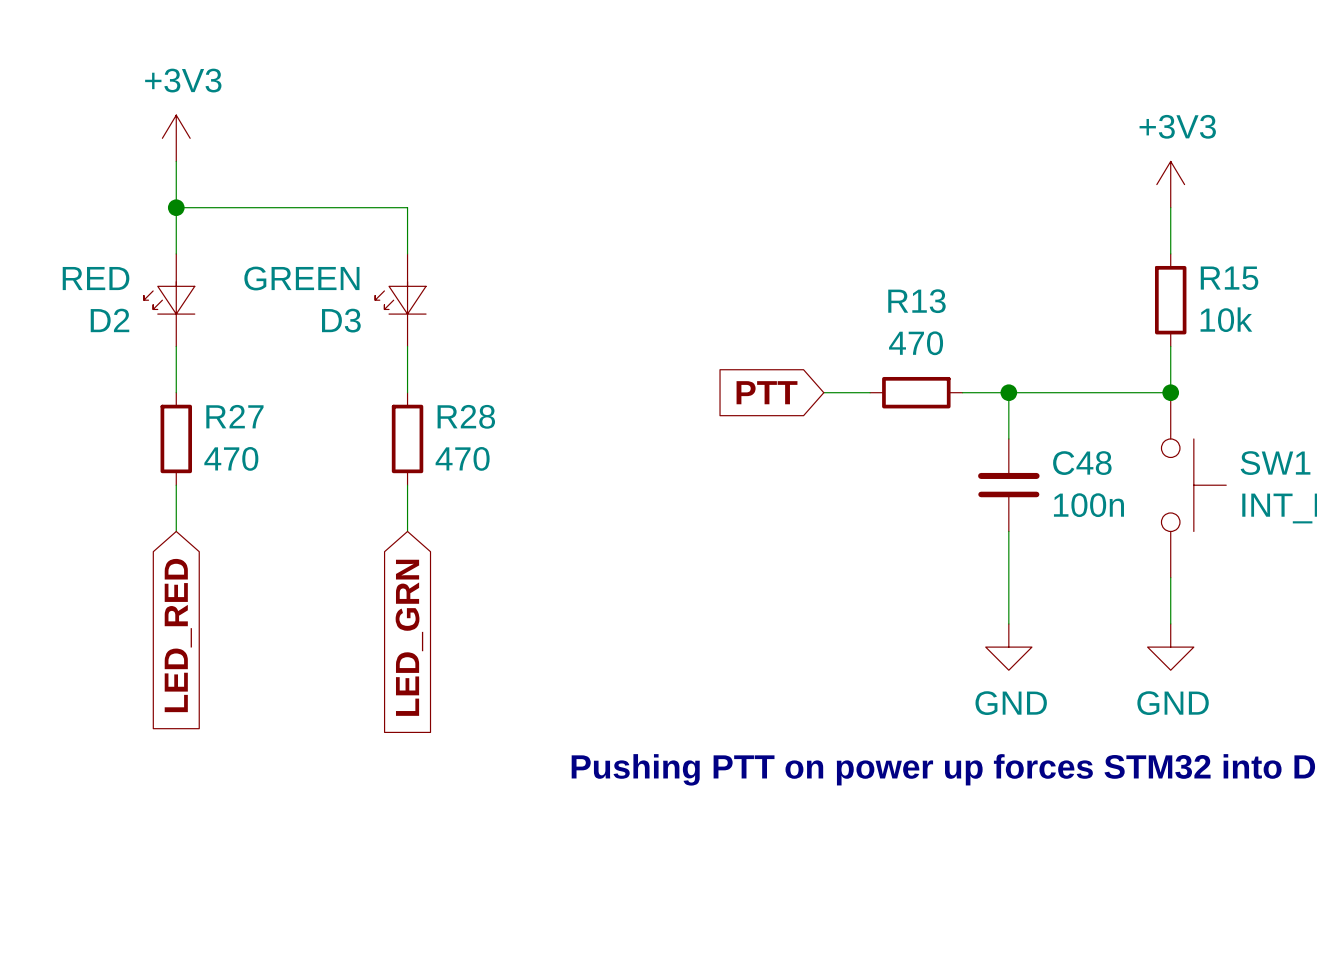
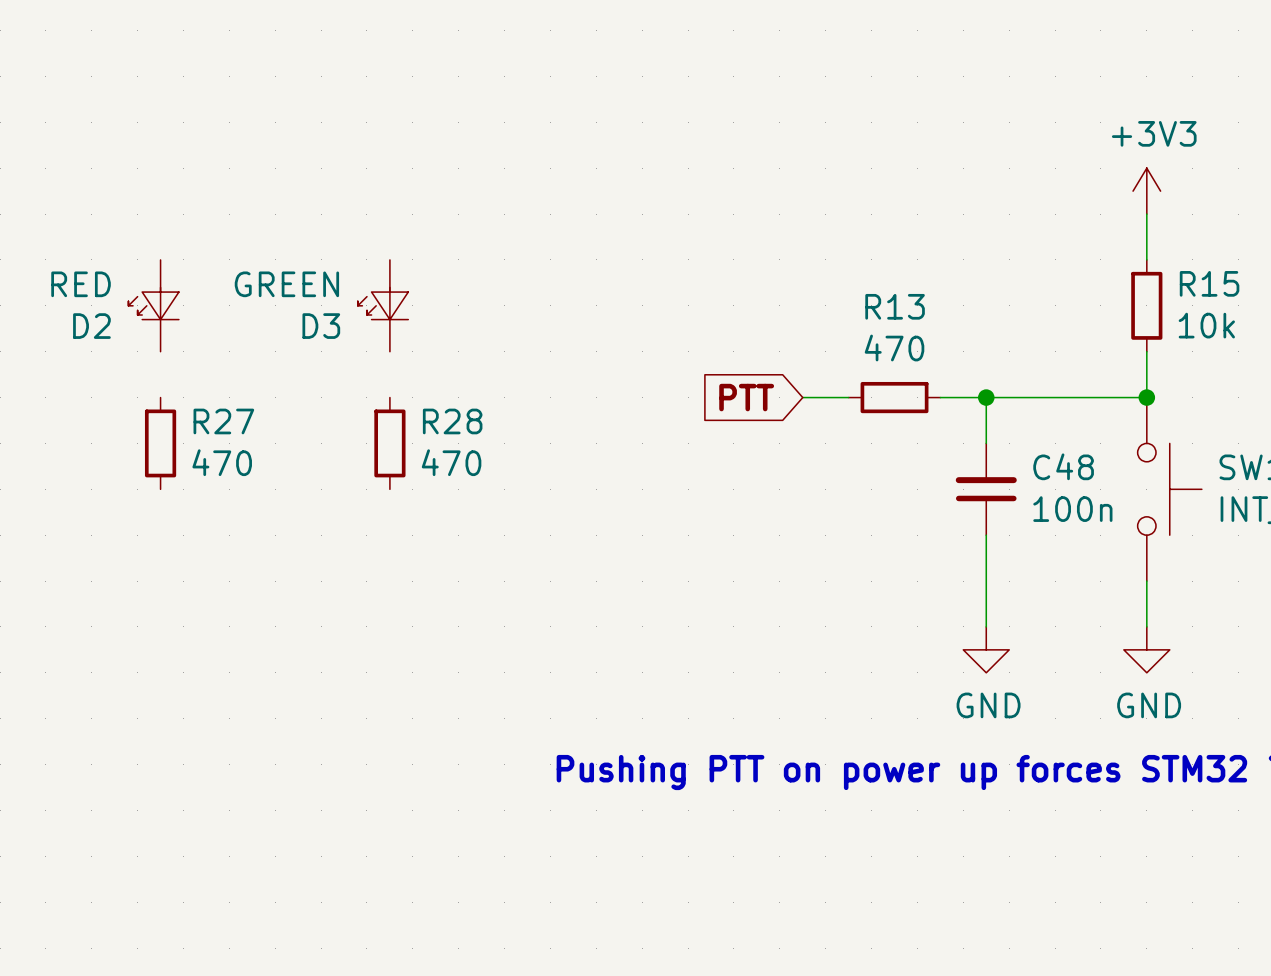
power symbol: +3V3 (176, 138) -> none
wire: (176, 161) (176, 253) -> none
wire: (176, 207) (407, 207) (407, 253) -> none
junction: (176, 207) -> none
wire: (176, 346) (176, 392) -> none
wire: (407, 346) (407, 392) -> none
wire: (176, 485) (176, 531) -> none
wire: (407, 485) (407, 531) -> none
global label: LED_RED (178, 635) -> none
global label: LED_GRN (409, 637) -> none

